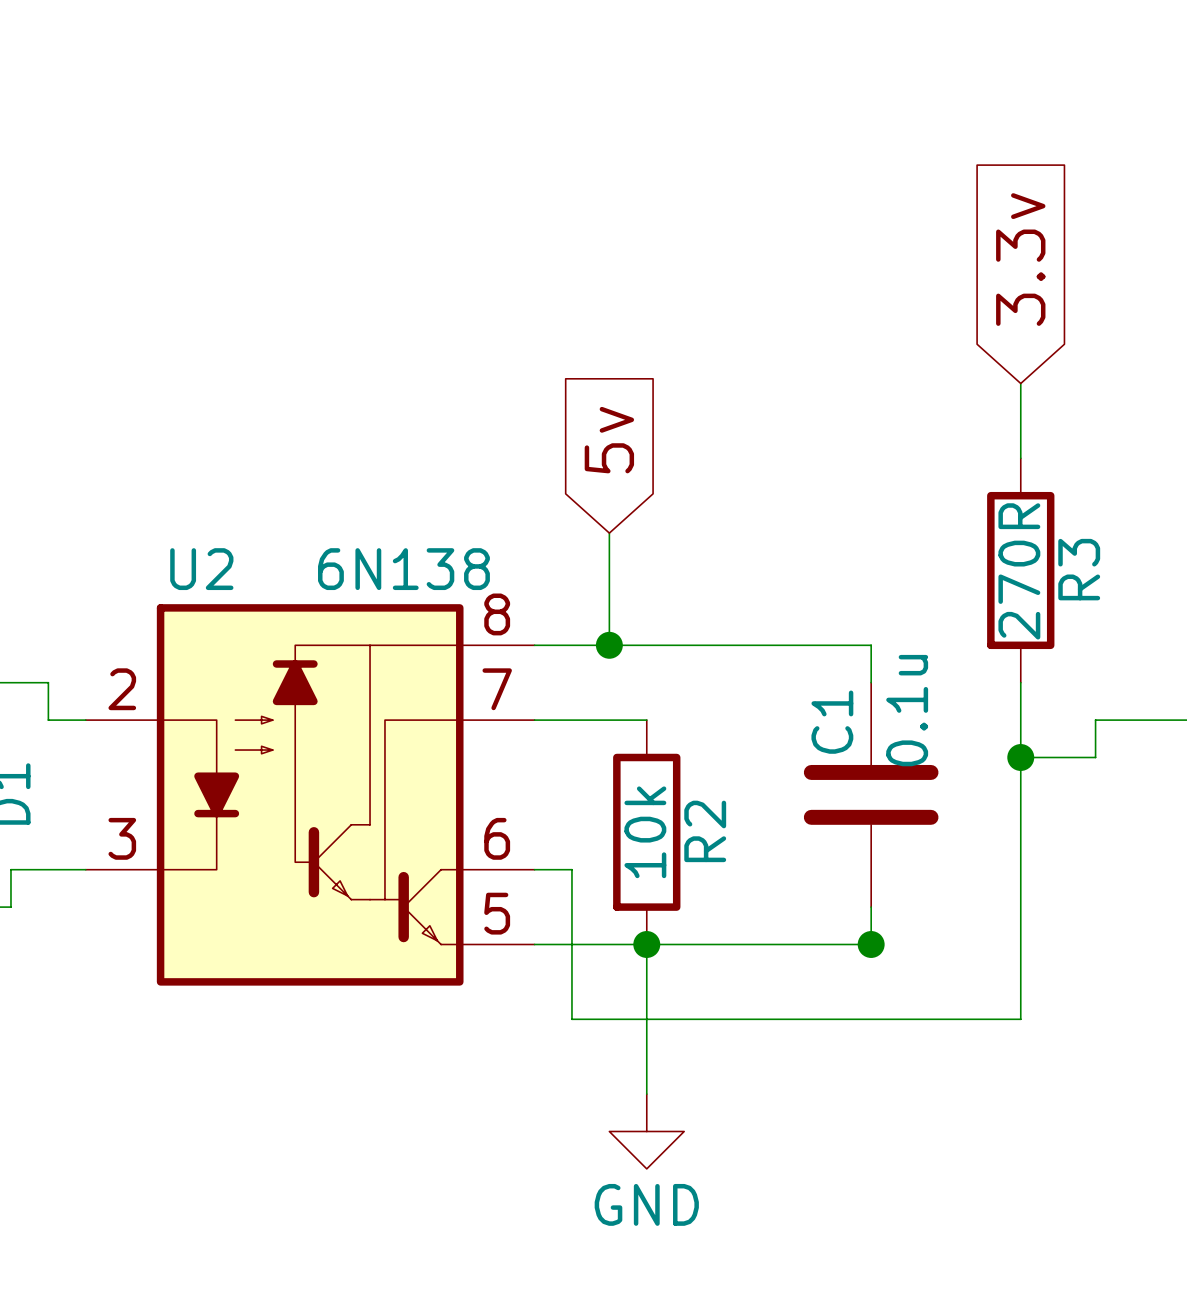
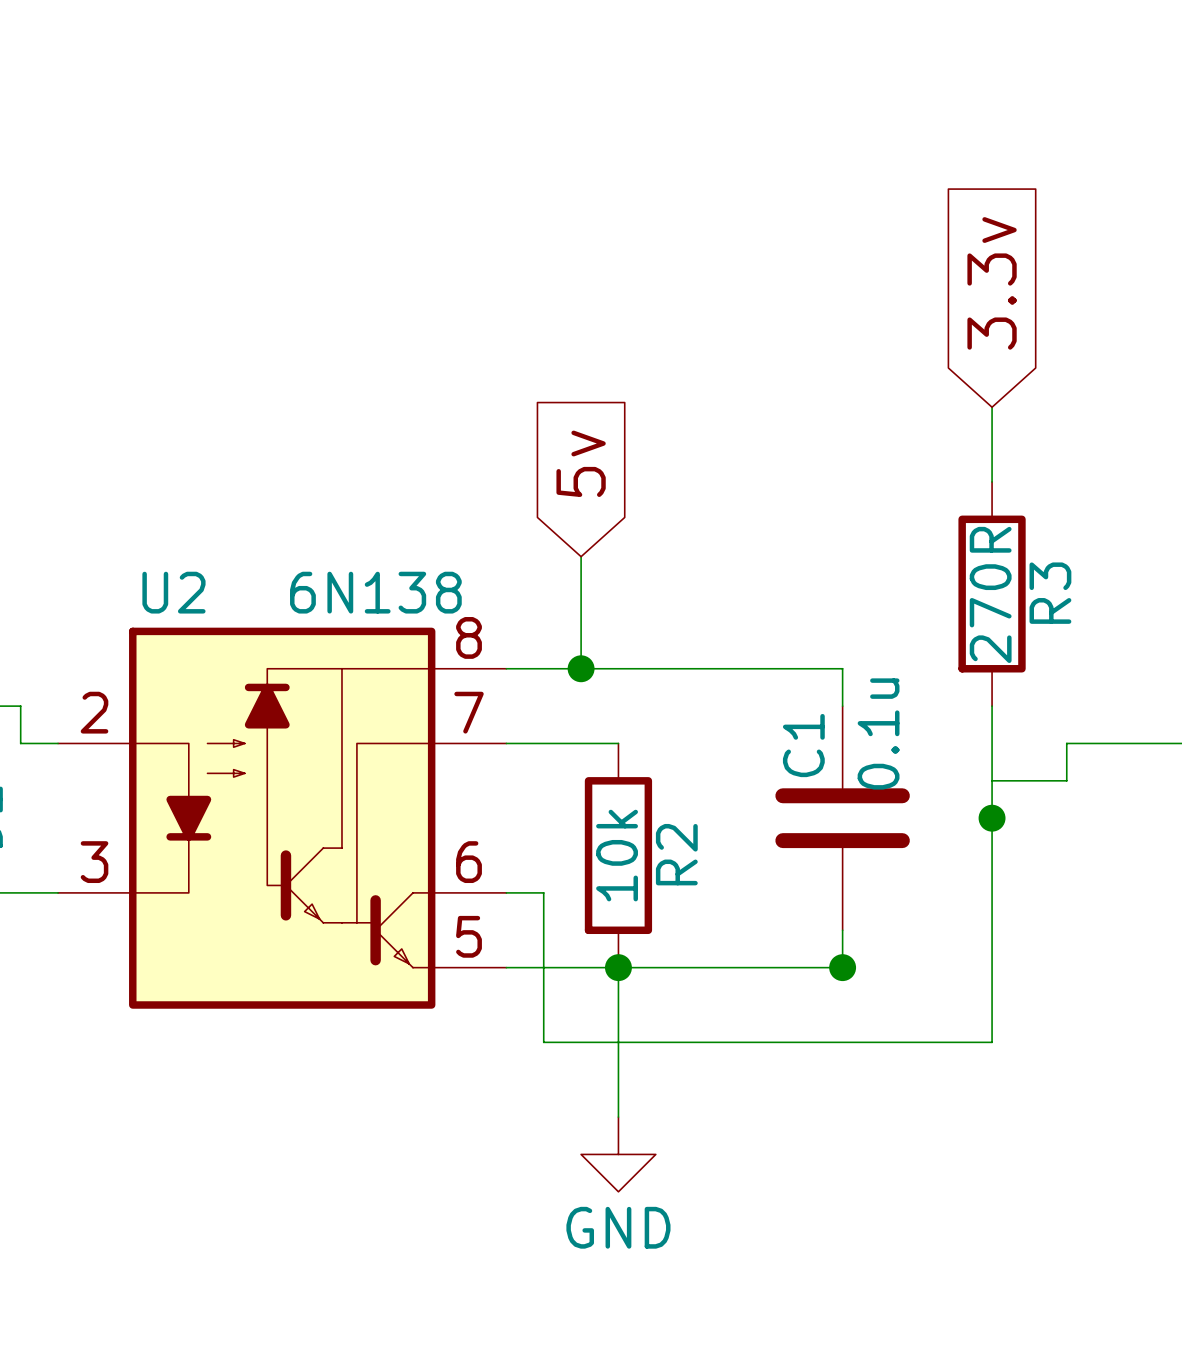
junction position: (1020, 757) -> (992, 818)

